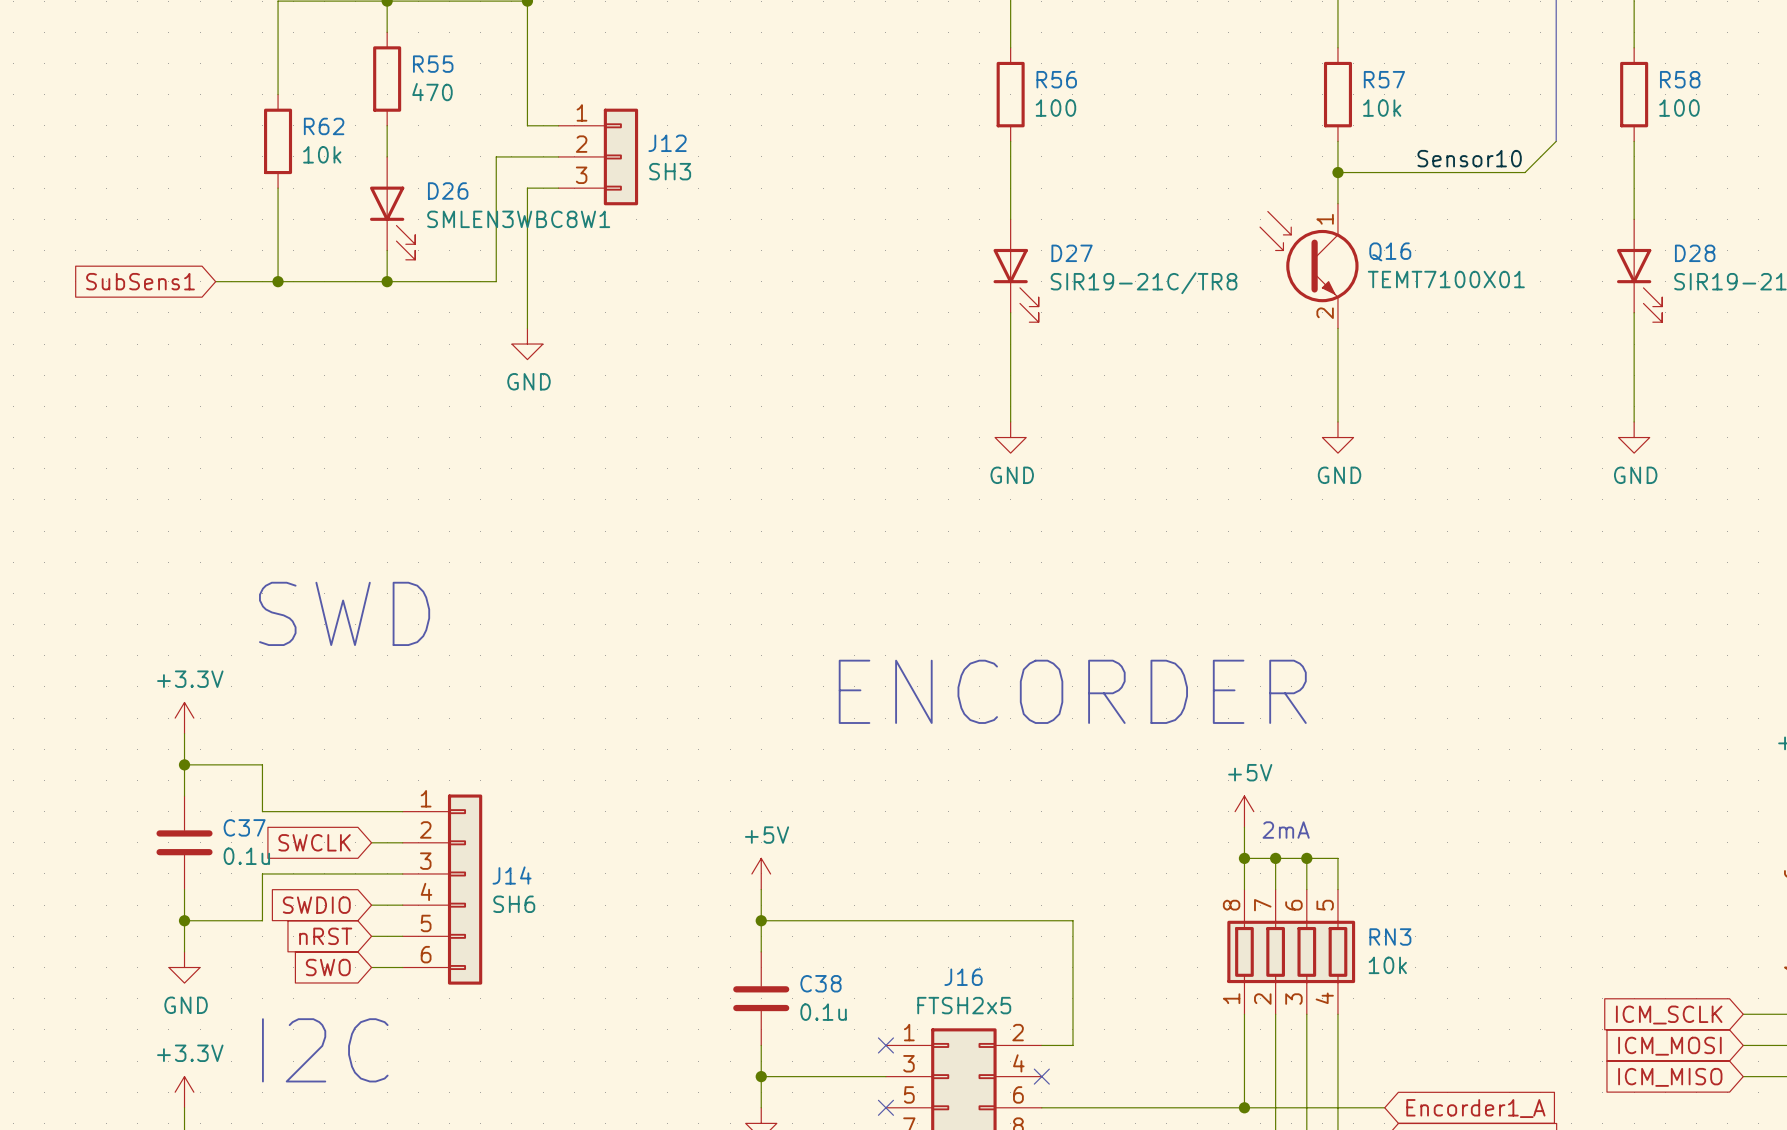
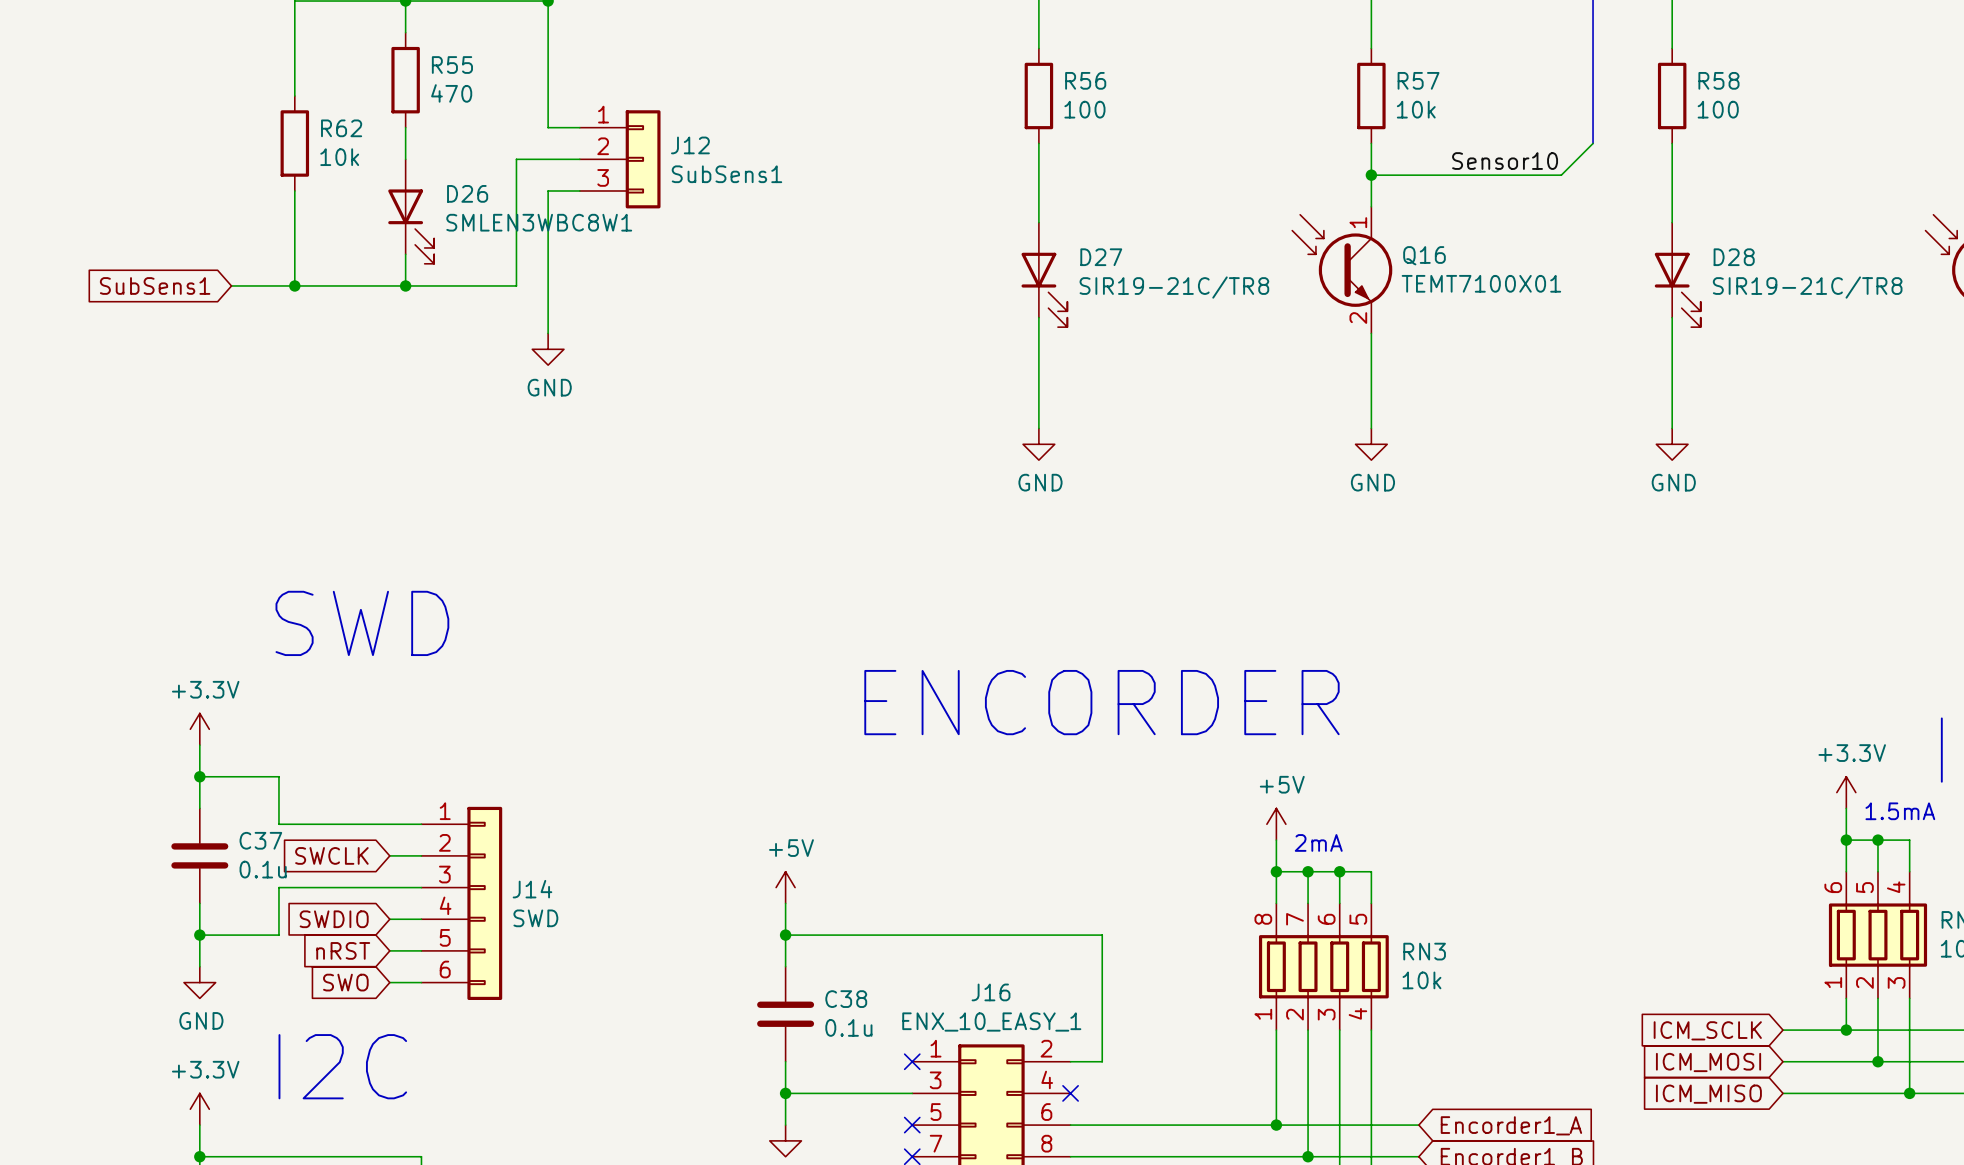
J12 value: SH3 (670, 171) -> SubSens1 (726, 174)
J14 value: SH6 (514, 904) -> SWD (535, 918)
J16 value: FTSH2x5 (964, 1005) -> ENX_10_EASY_1 (991, 1022)

